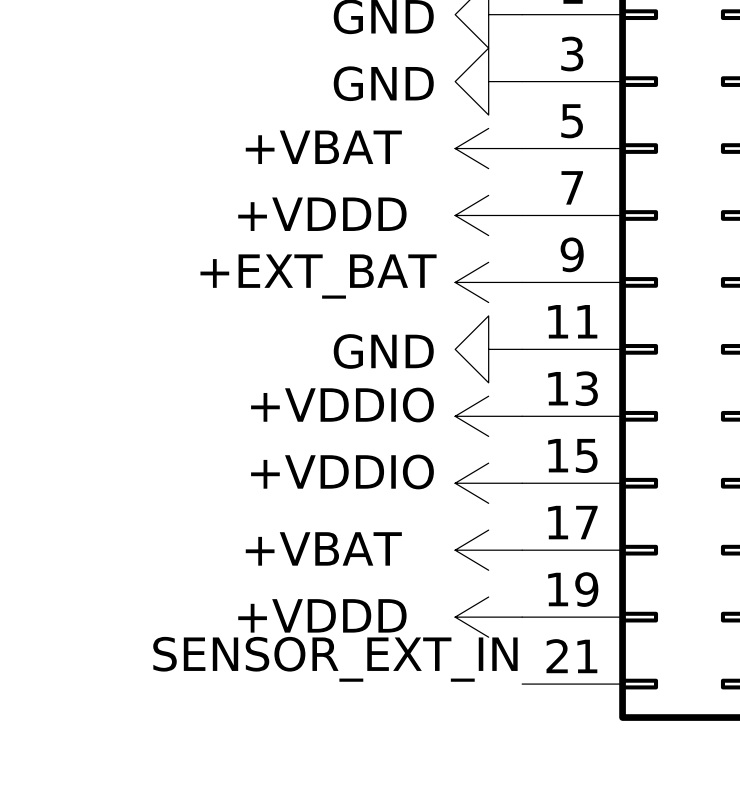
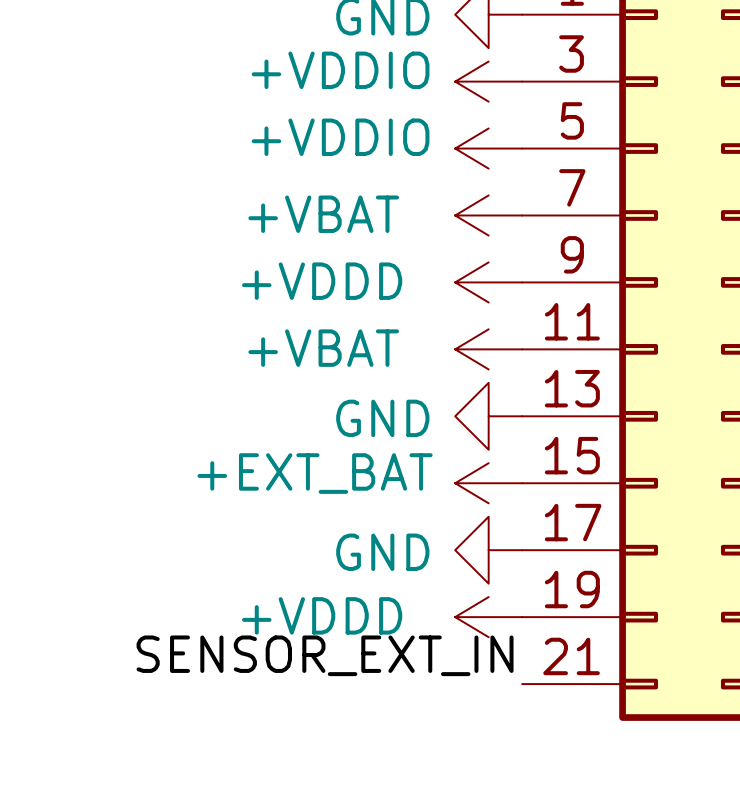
power symbol: GND (488, 81) -> +VDDIO (488, 81)
power symbol: +VBAT (488, 148) -> +VDDIO (488, 148)
power symbol: +VDDD (488, 215) -> +VBAT (488, 215)
power symbol: +EXT_BAT (488, 282) -> +VDDD (488, 282)
power symbol: GND (488, 349) -> +VBAT (488, 349)
power symbol: +VDDIO (488, 416) -> GND (488, 416)
power symbol: +VDDIO (488, 483) -> +EXT_BAT (488, 483)
power symbol: +VBAT (488, 550) -> GND (488, 550)

